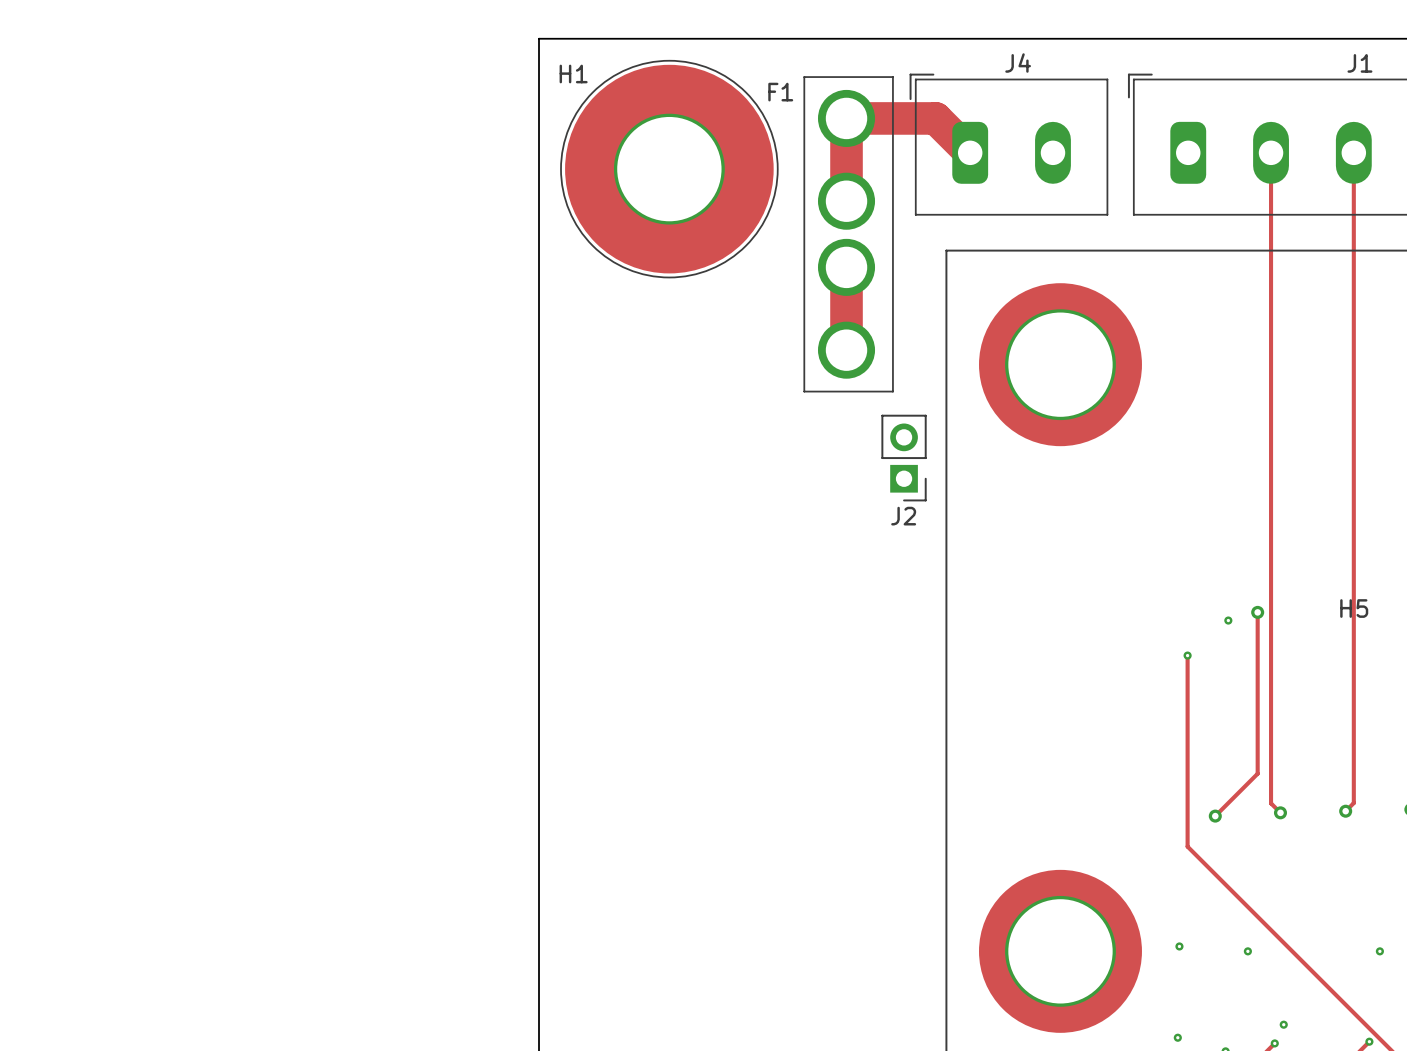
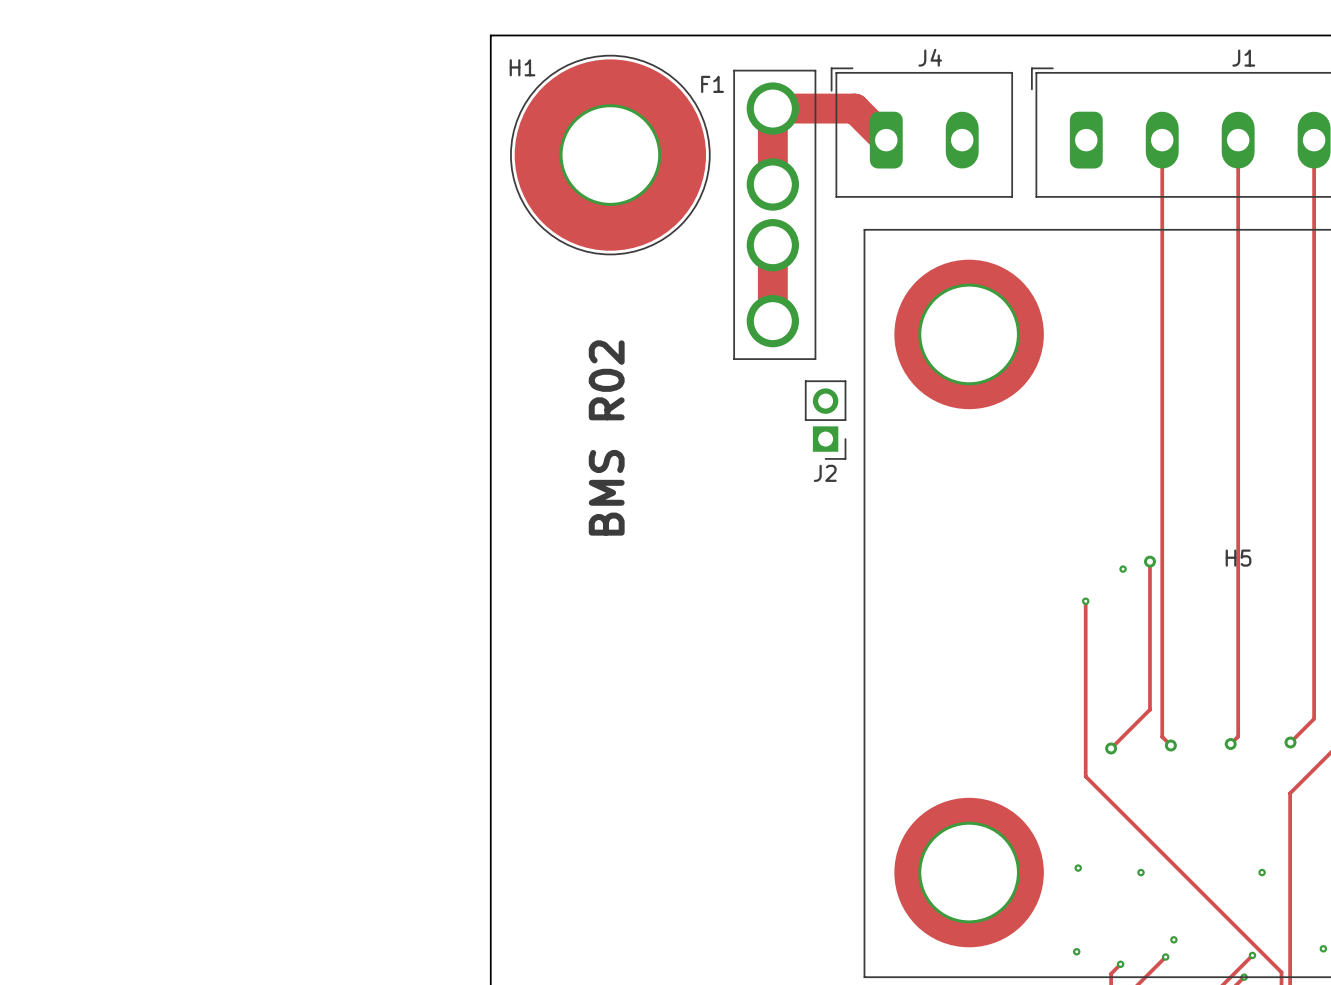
text: none -> BMS R02 (606, 437)

